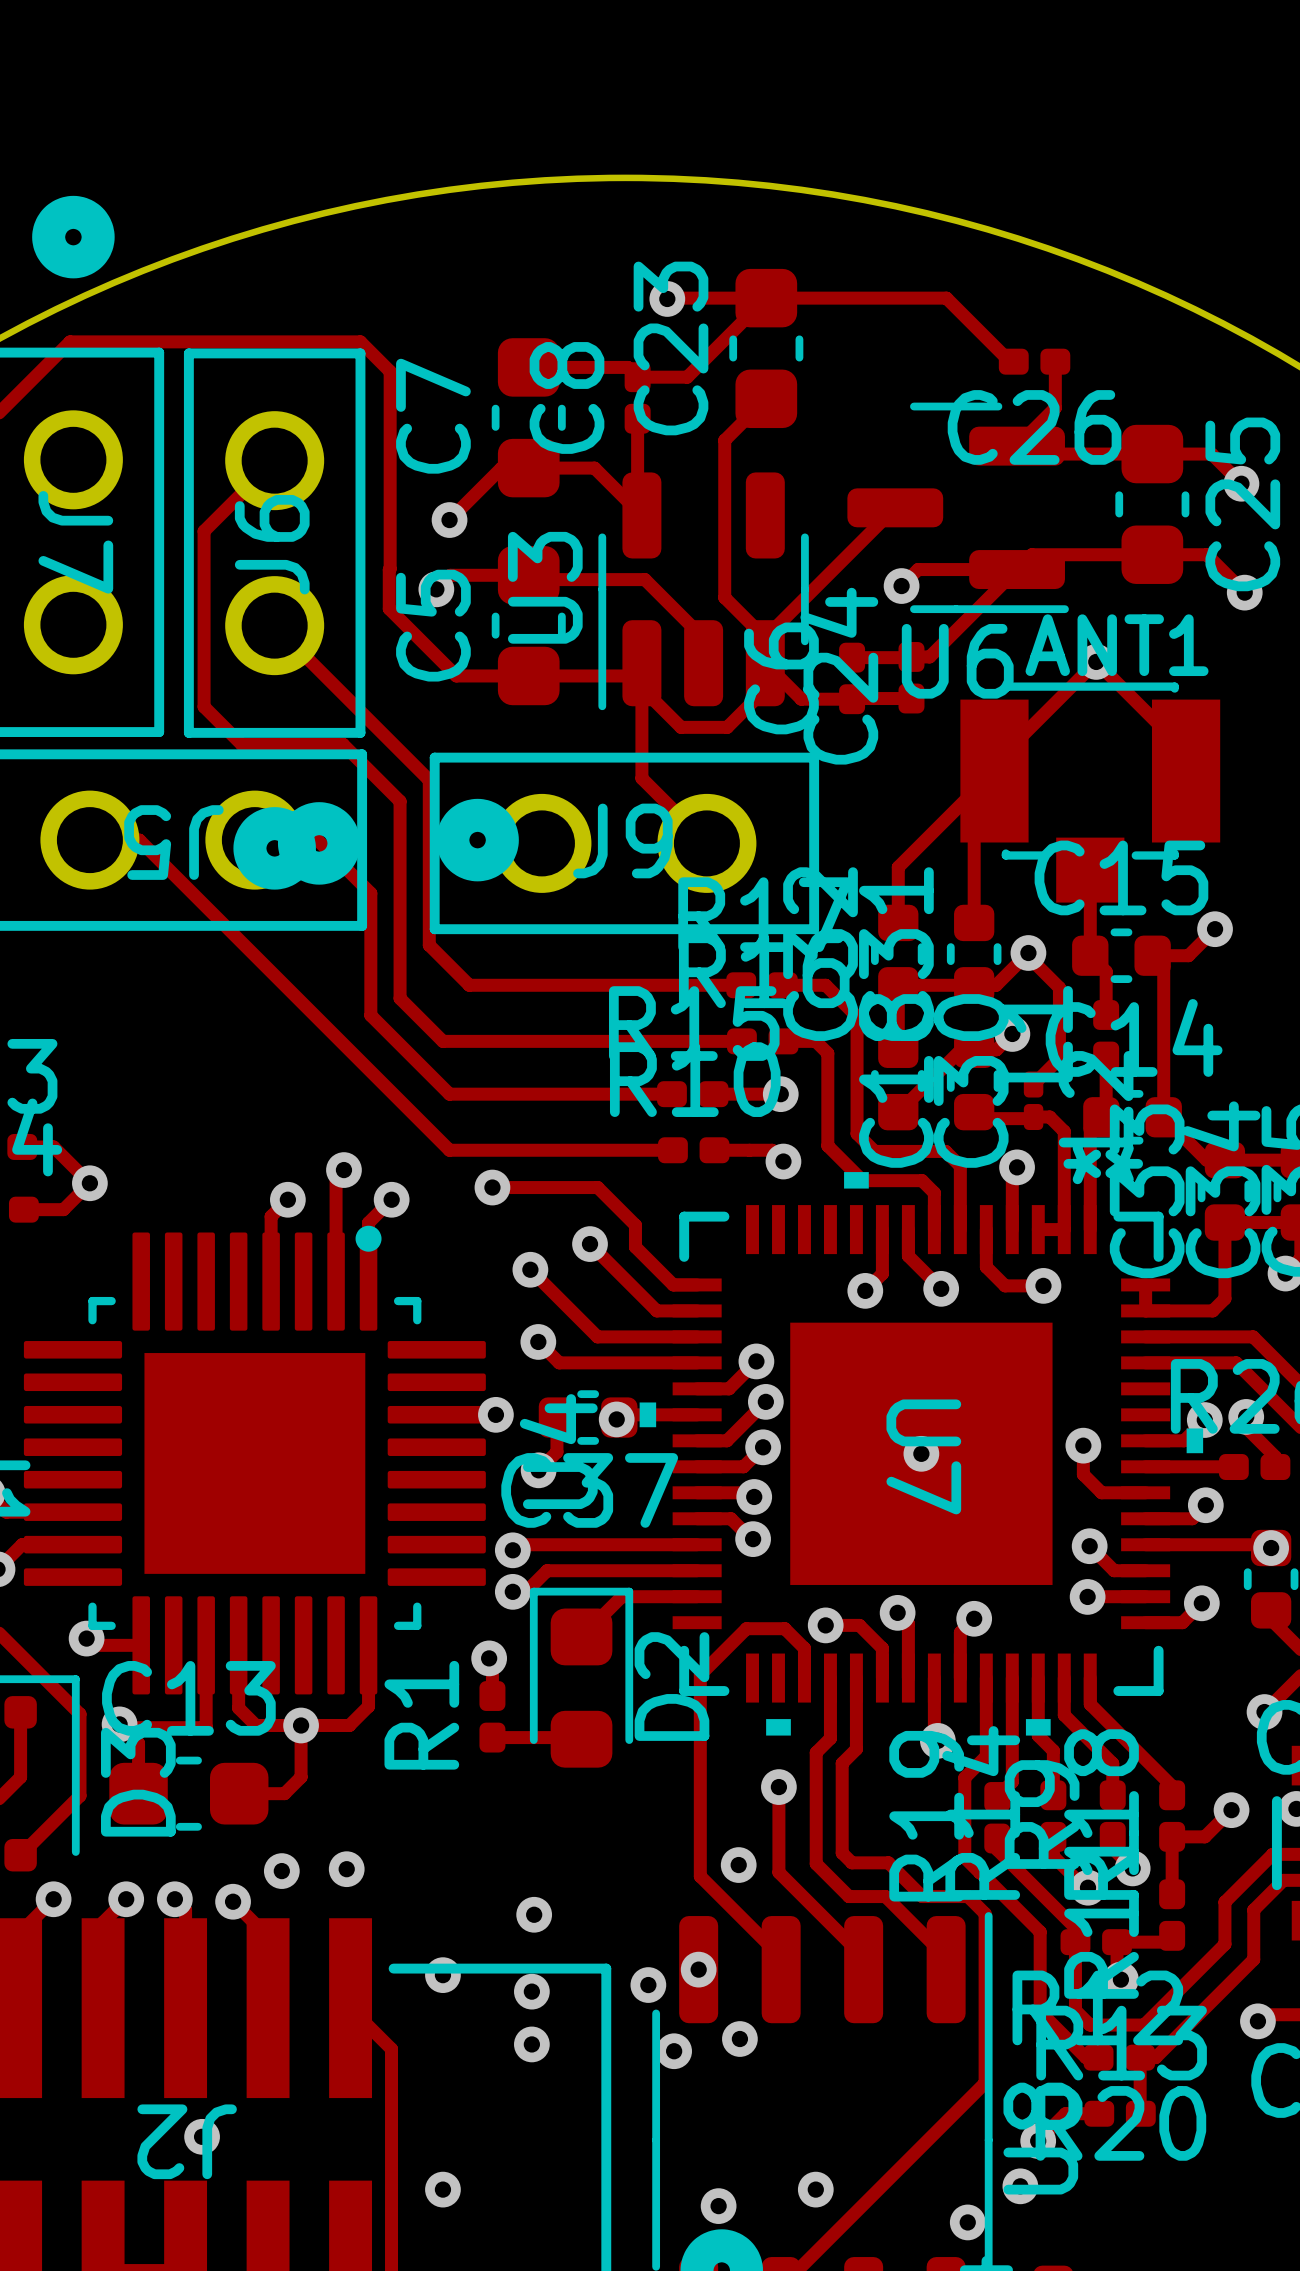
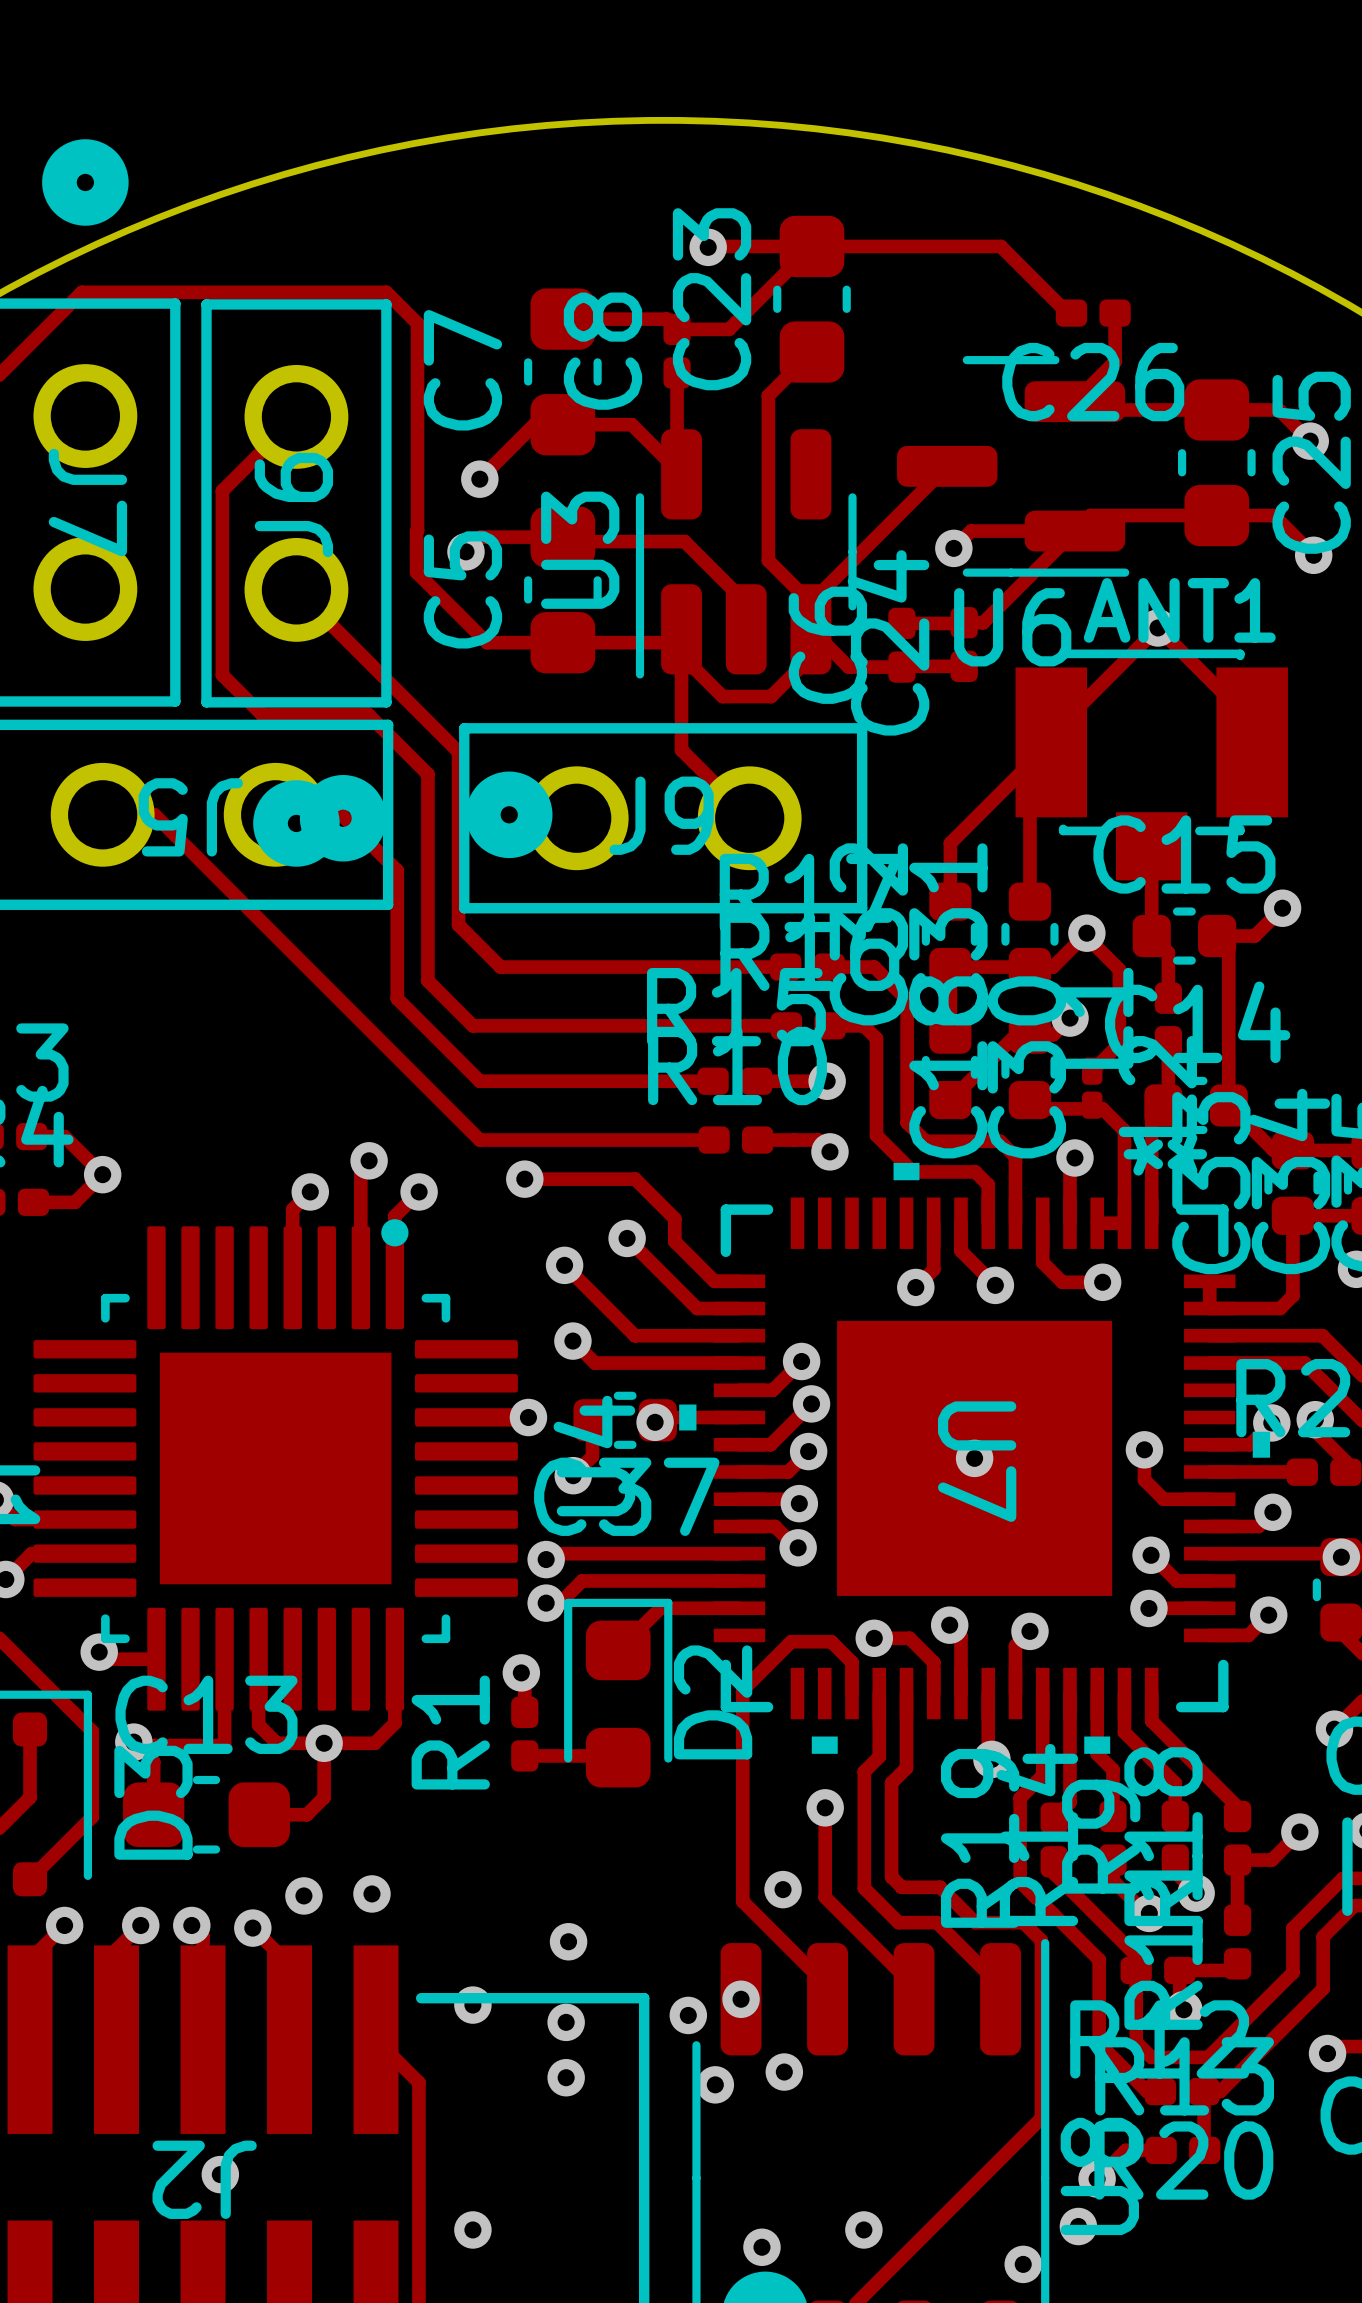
track: (1033, 1117) (1049, 1117) (1064, 1131) (1064, 1141) -> none
track: (980, 1118) (1027, 1118) -> (1036, 1106) (1038, 1108) (1102, 1108) (1124, 1130)

